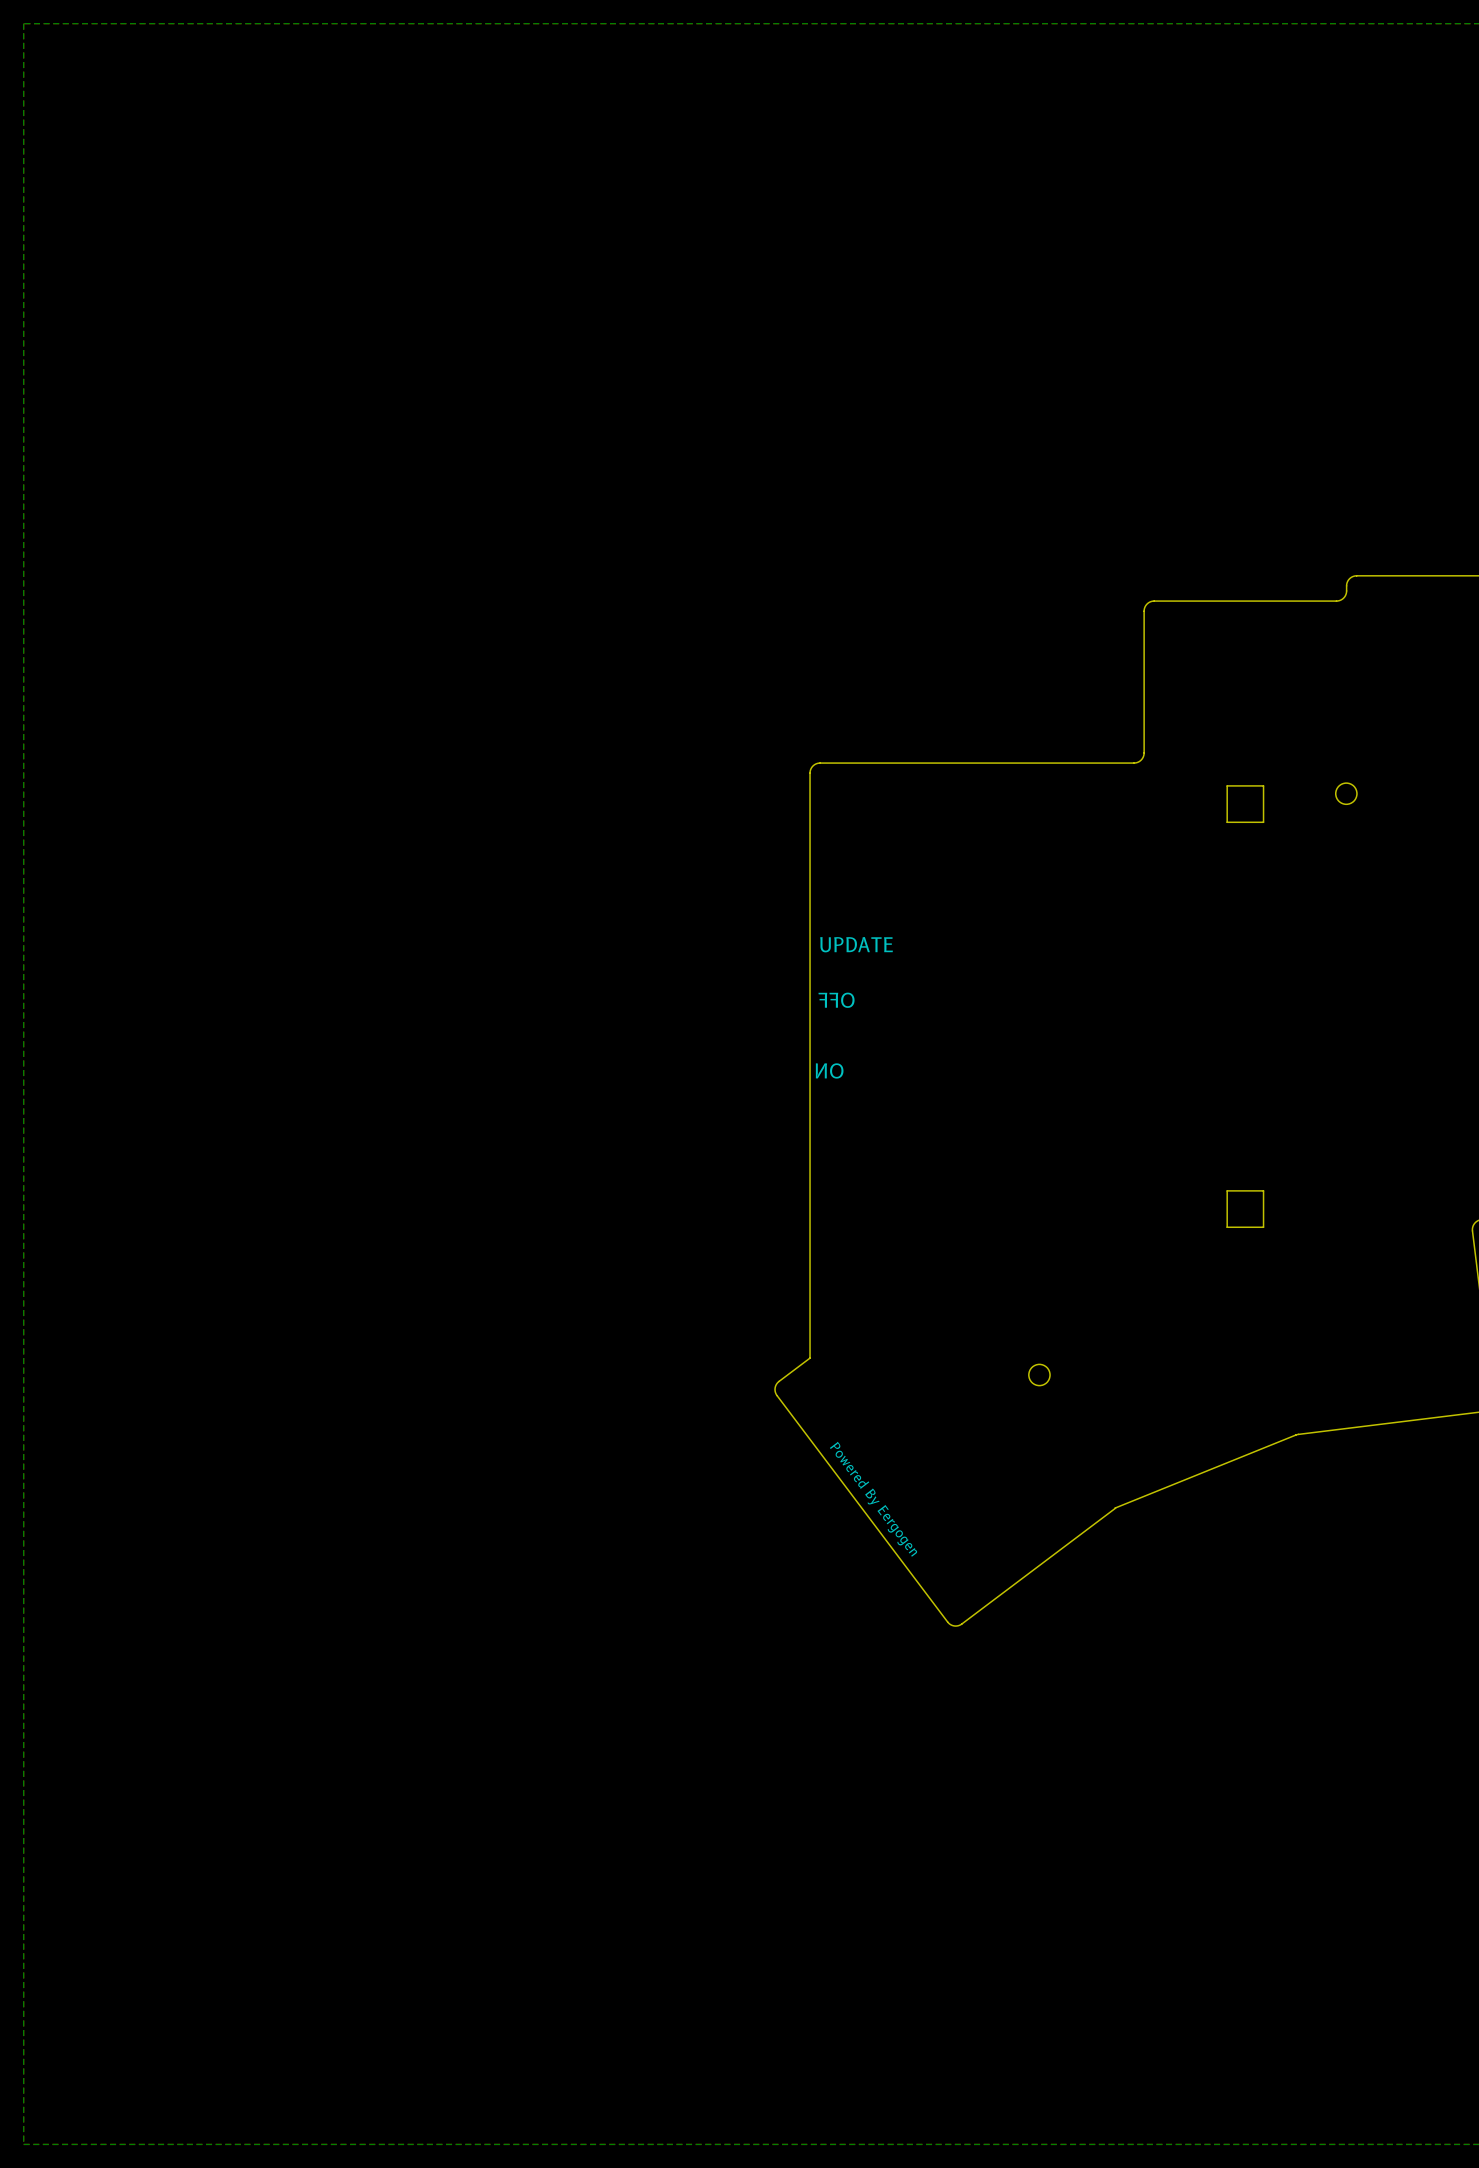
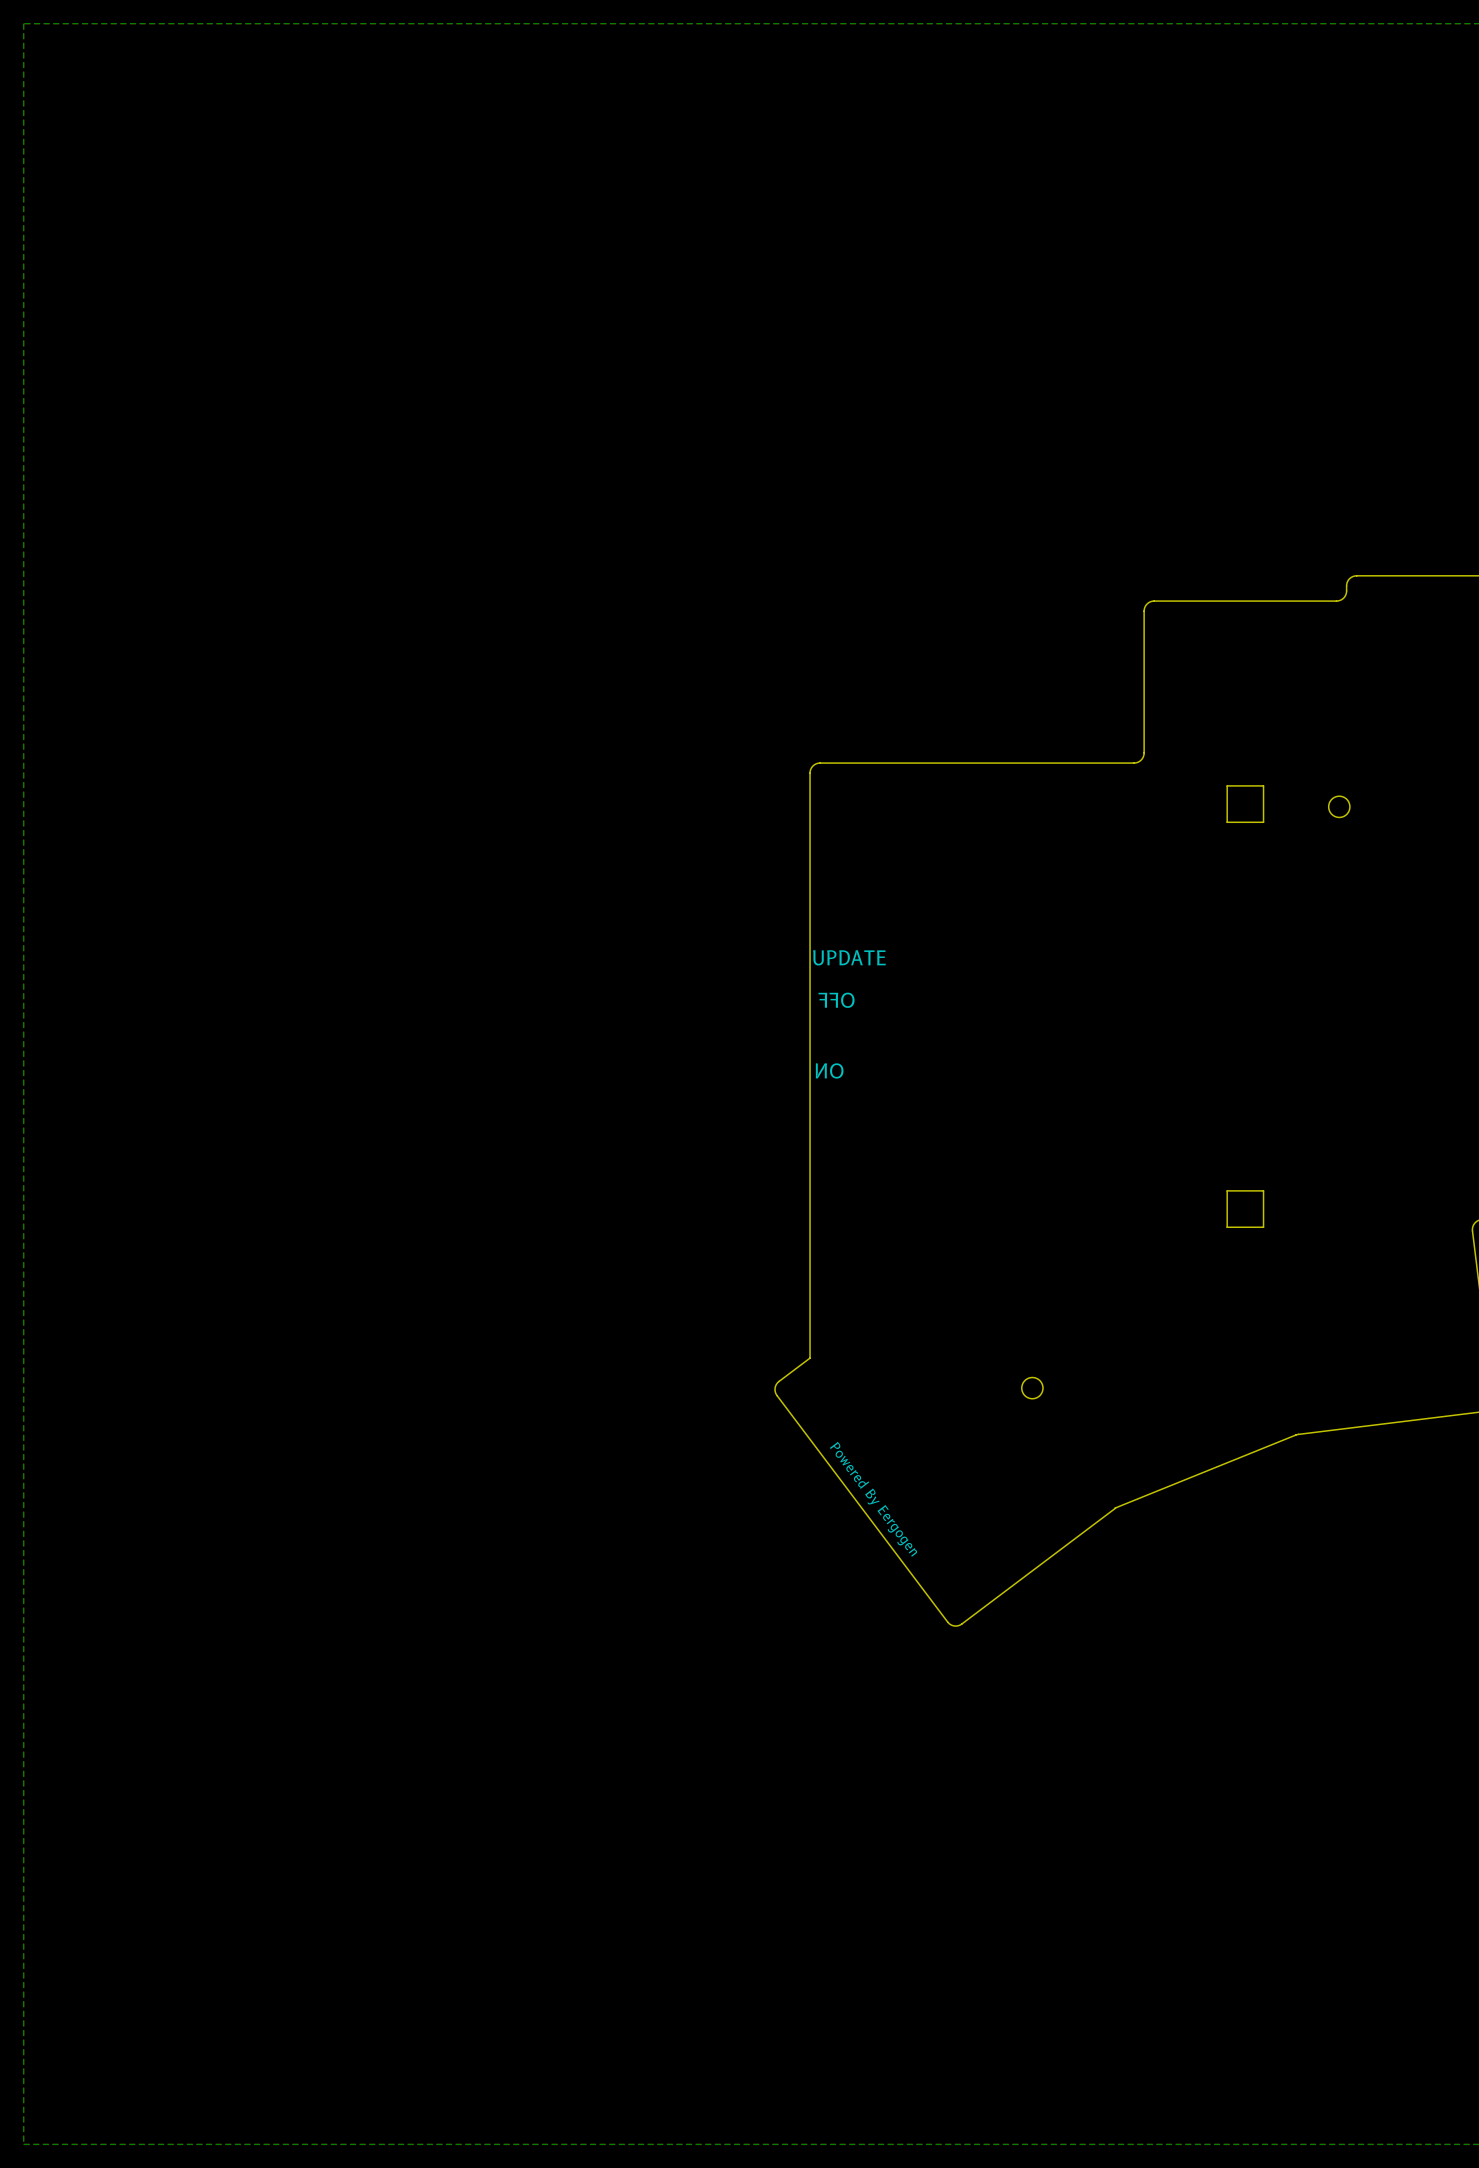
round board edge position: (1346, 793) -> (1339, 806)
text position: UPDATE (856, 944) -> UPDATE (849, 957)
round board edge position: (1039, 1375) -> (1032, 1388)

